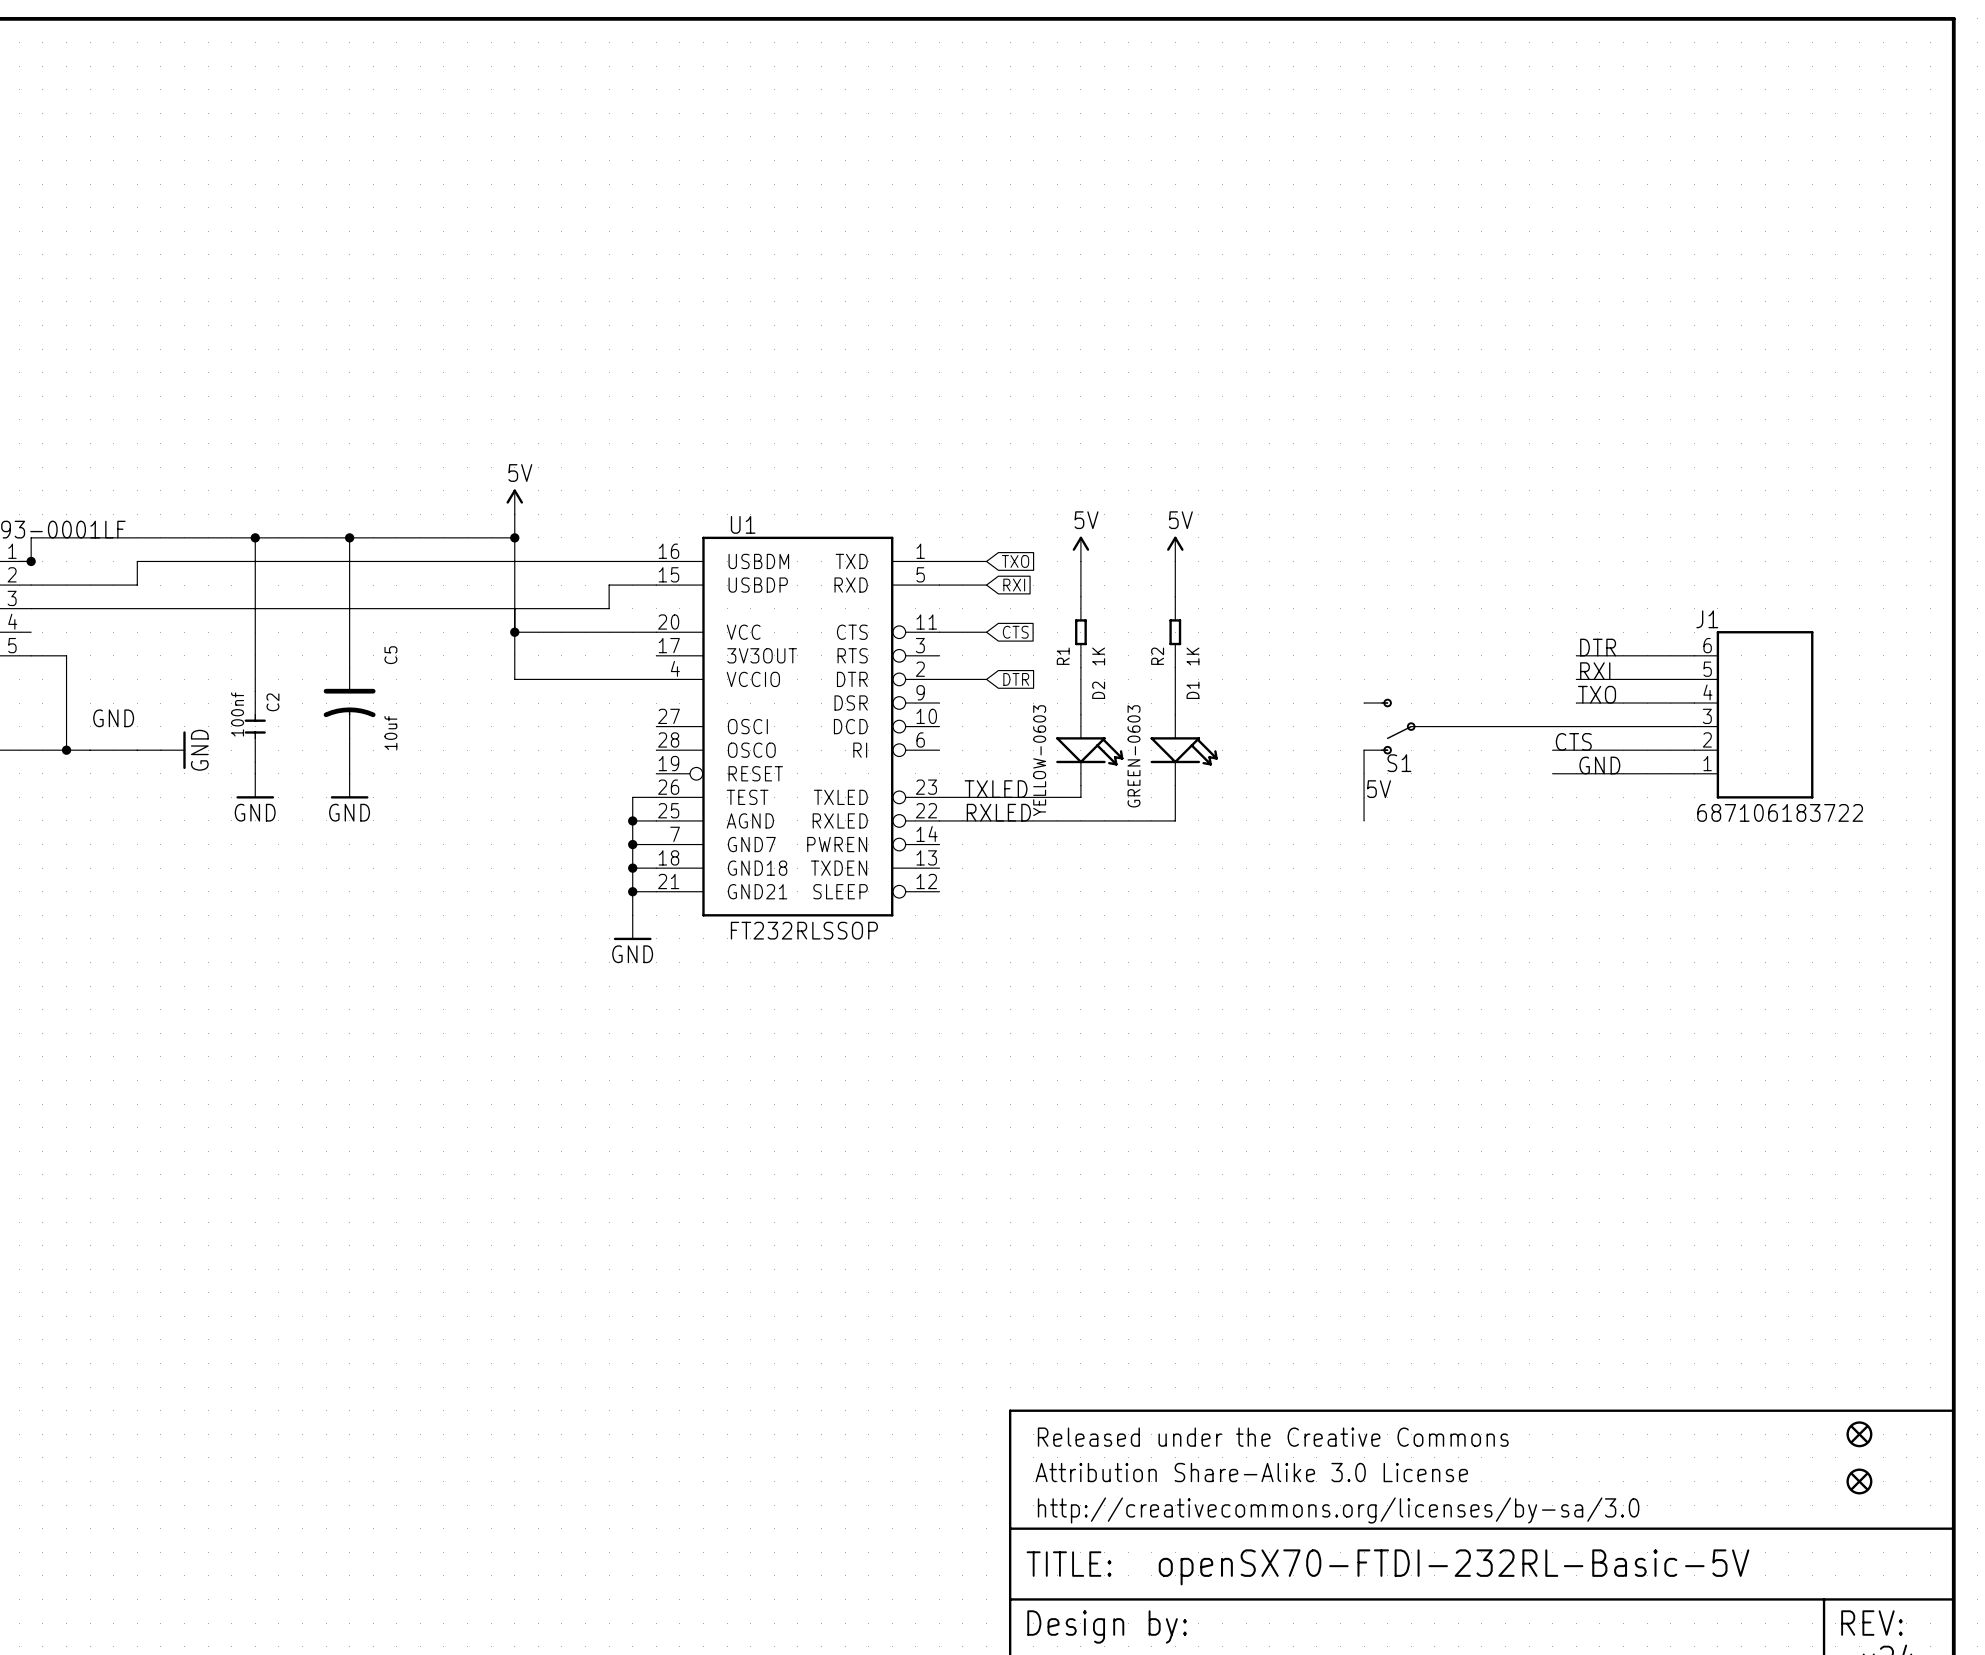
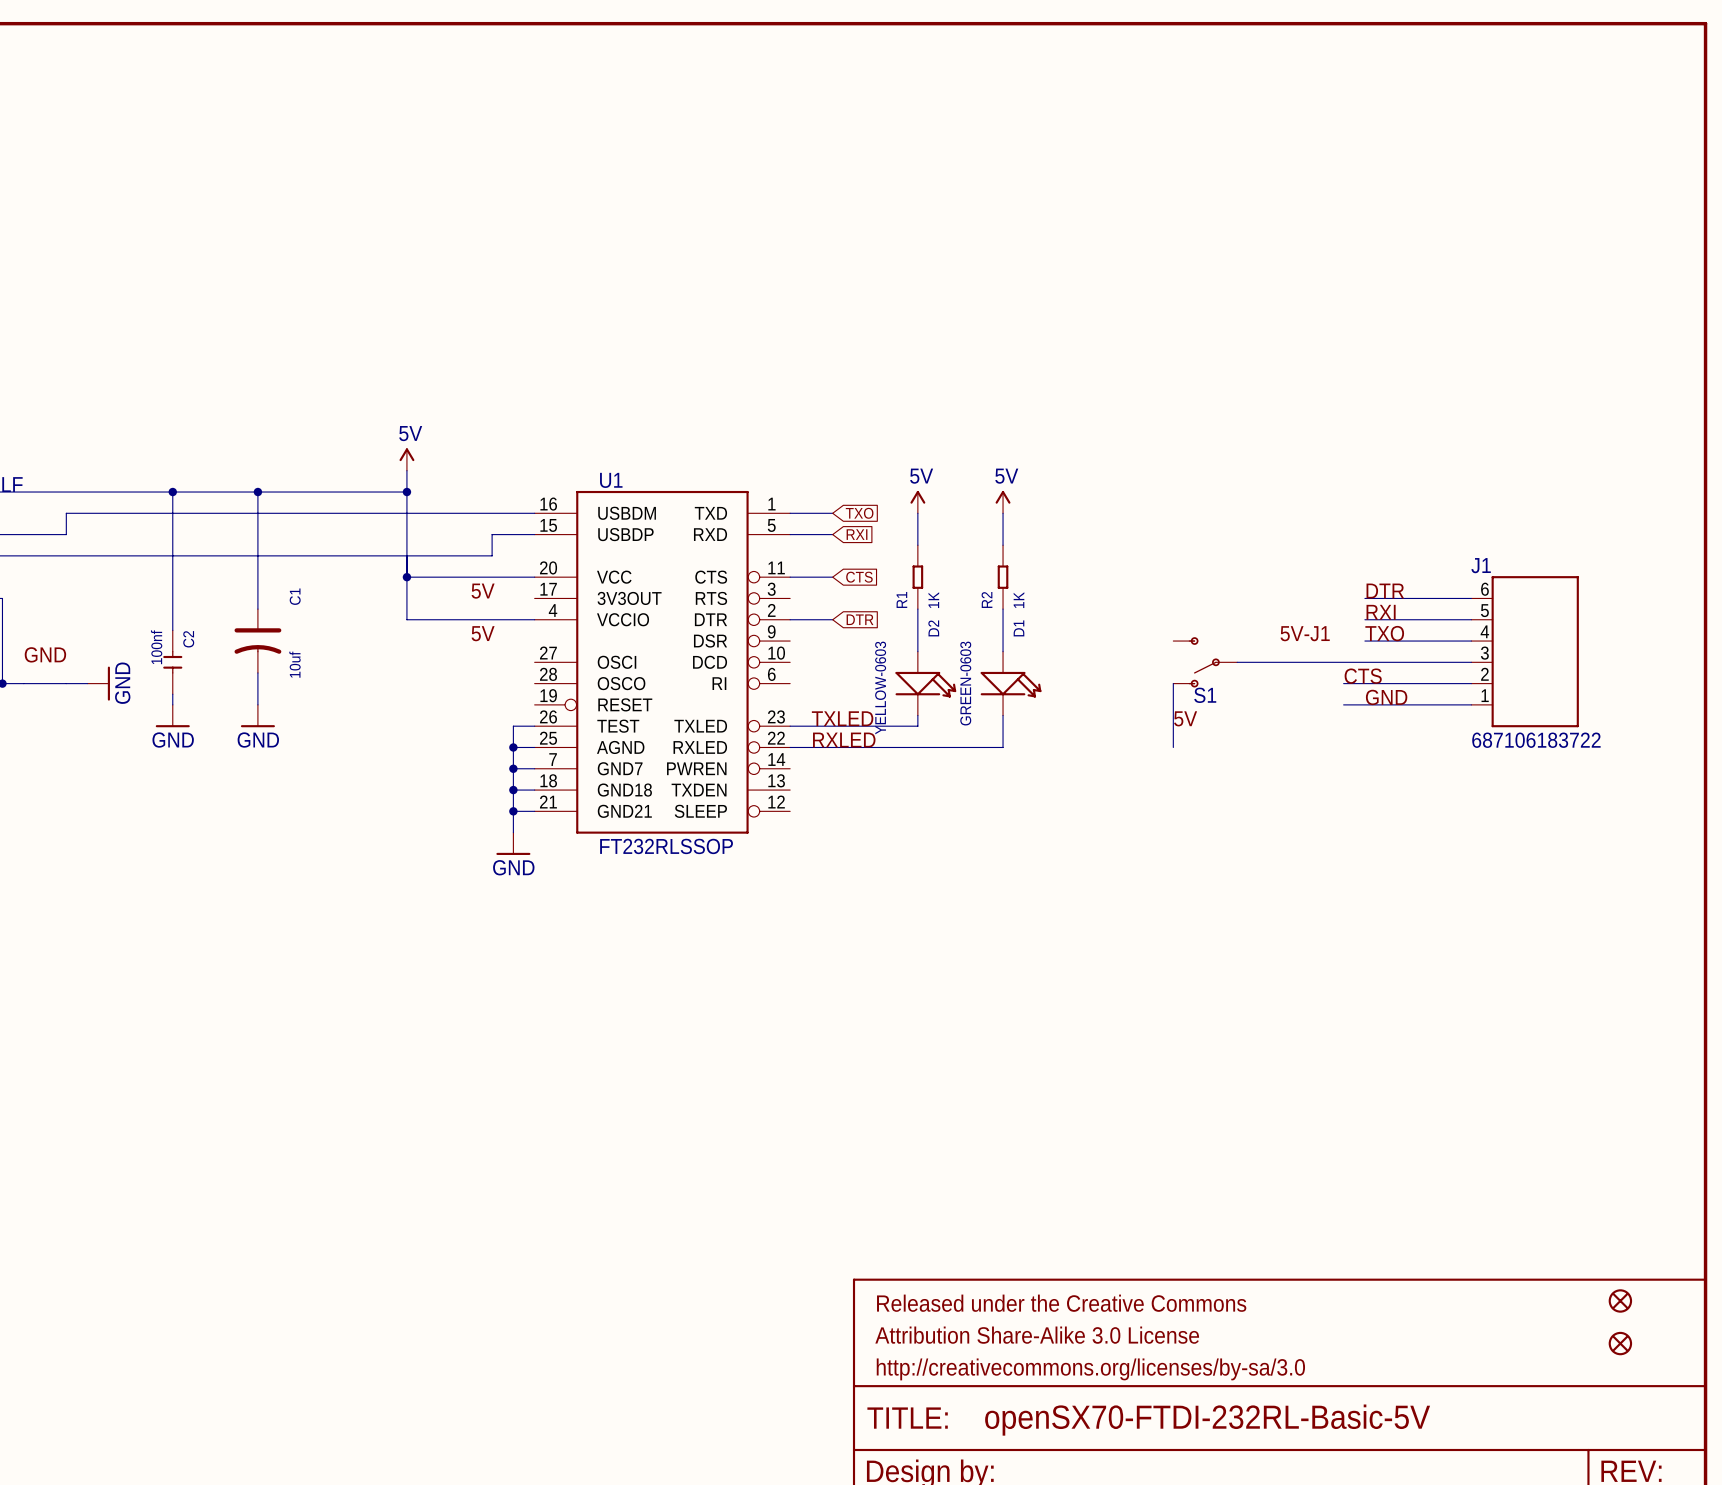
label: none -> 5V (483, 591)
C5 name: C5 (390, 655) -> C1 (295, 596)
label: none -> 5V (483, 633)
label: none -> 5V-J1 (1305, 633)

